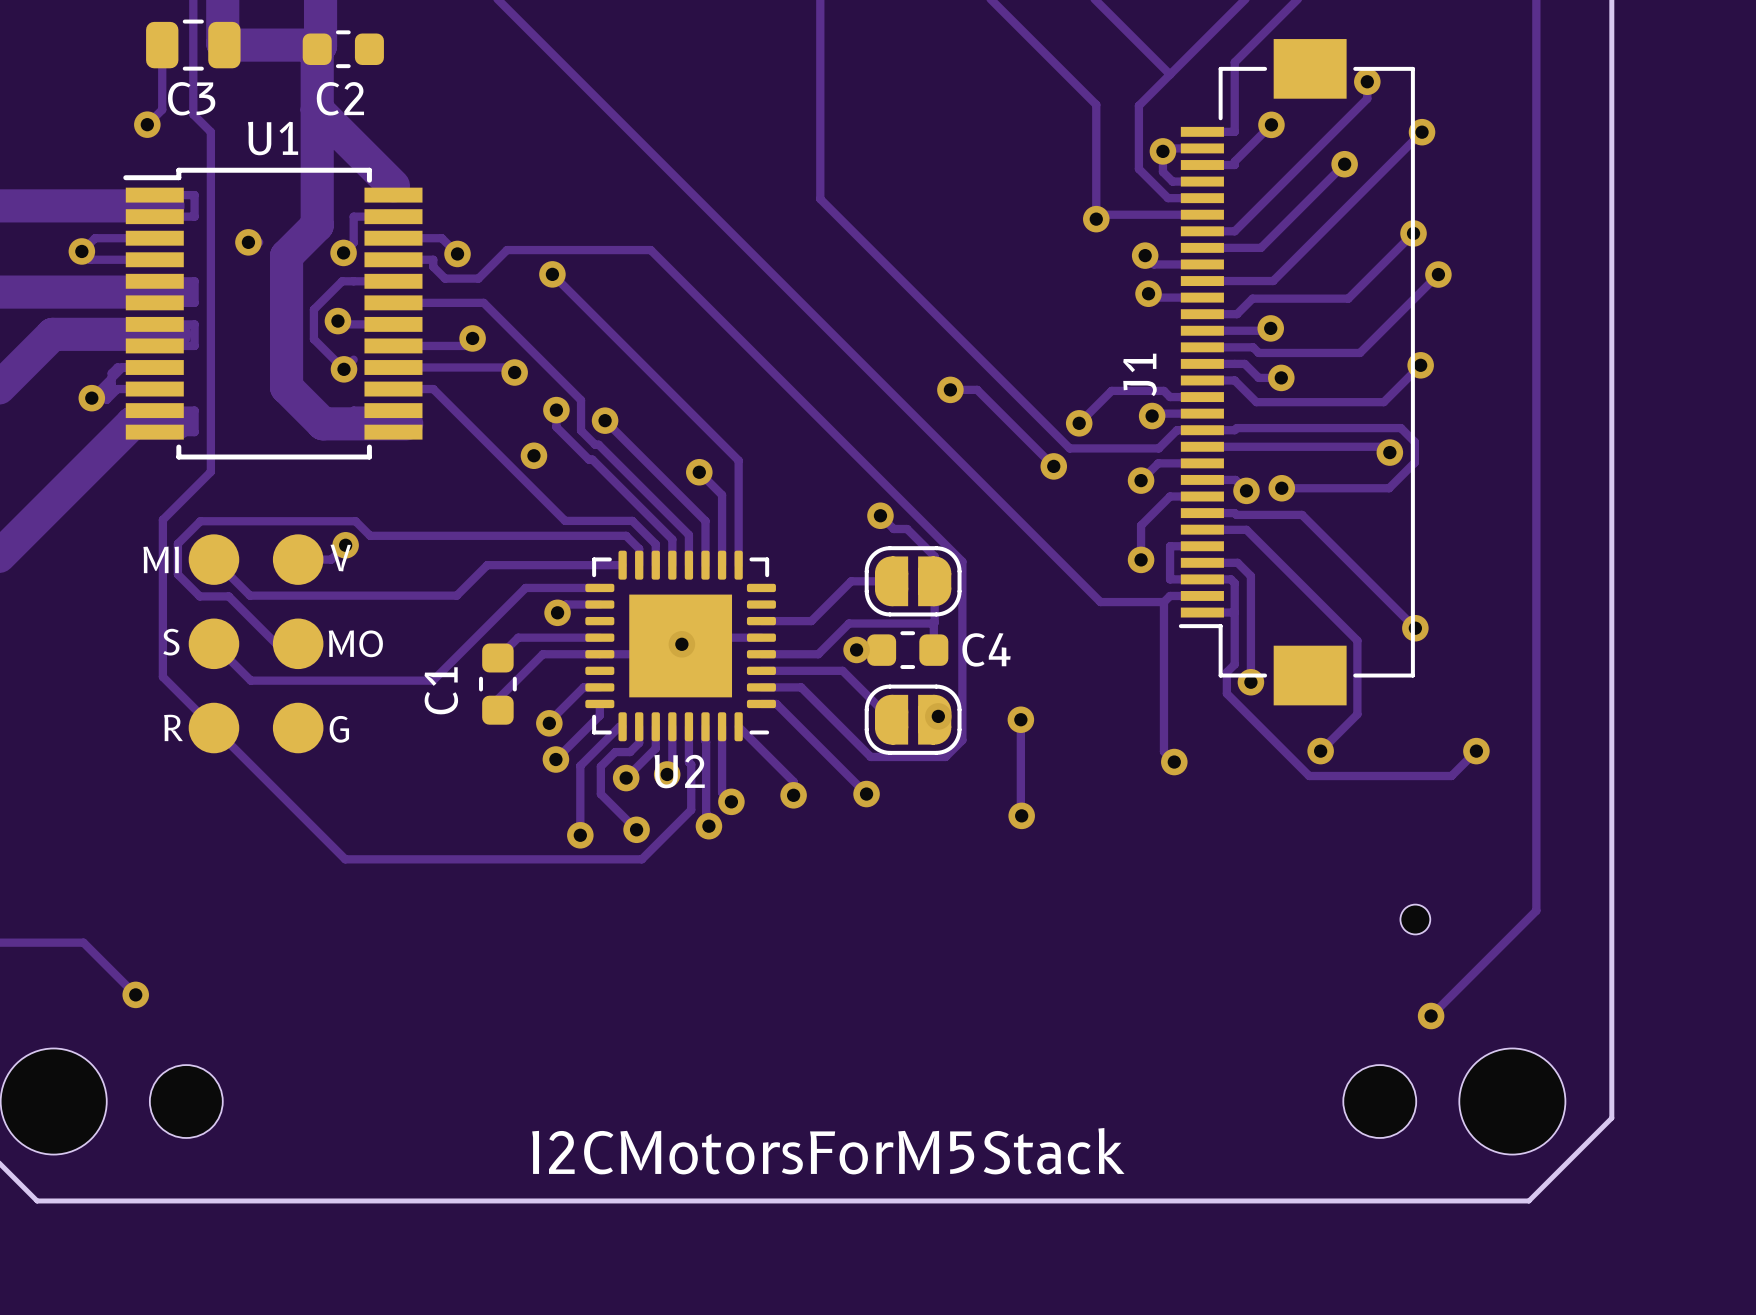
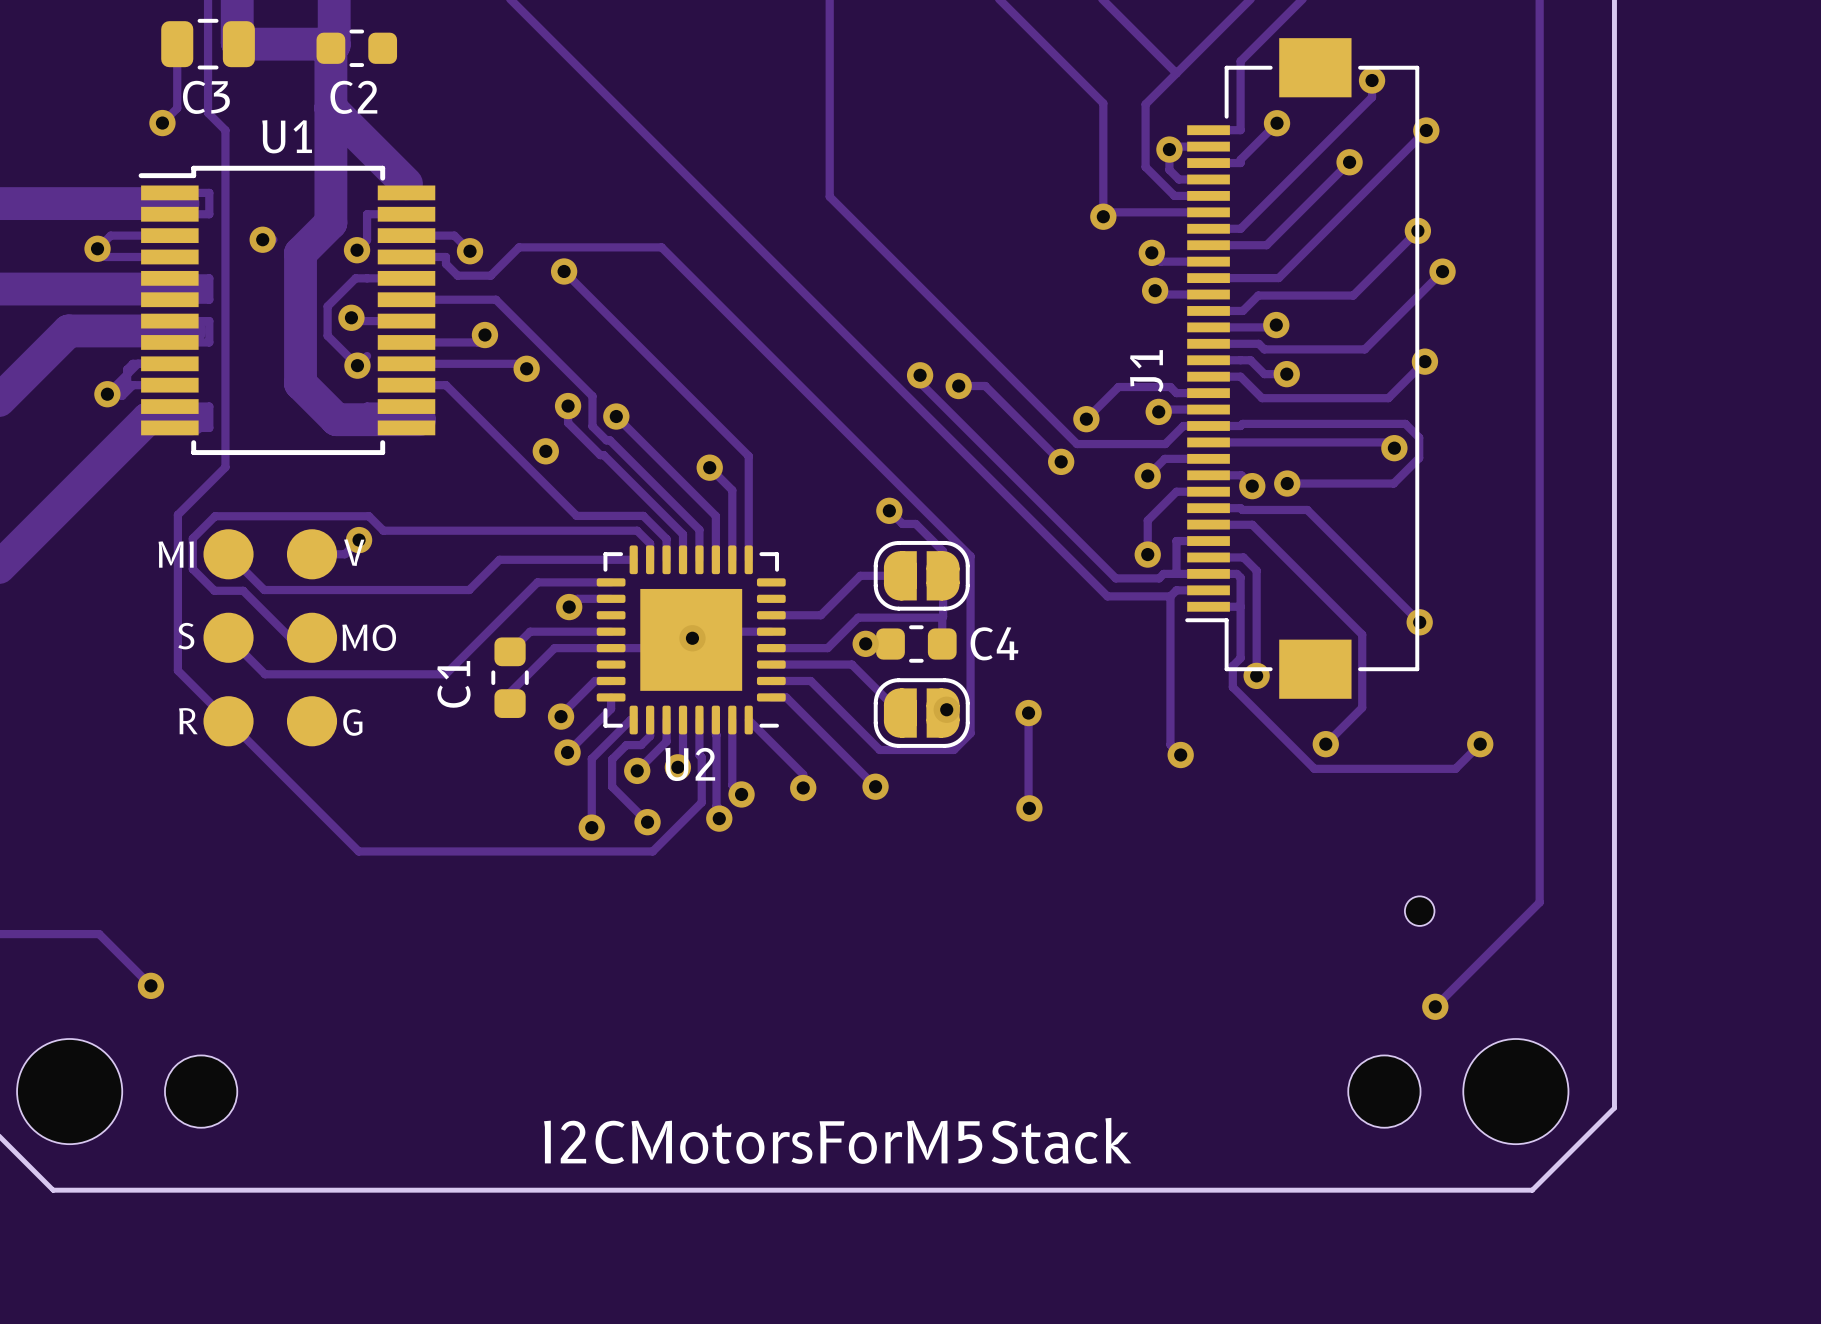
track: none -> (920, 375) (920, 382) (1115, 578) (1159, 578) (1163, 573) (1176, 573)
via: none -> (920, 375)

